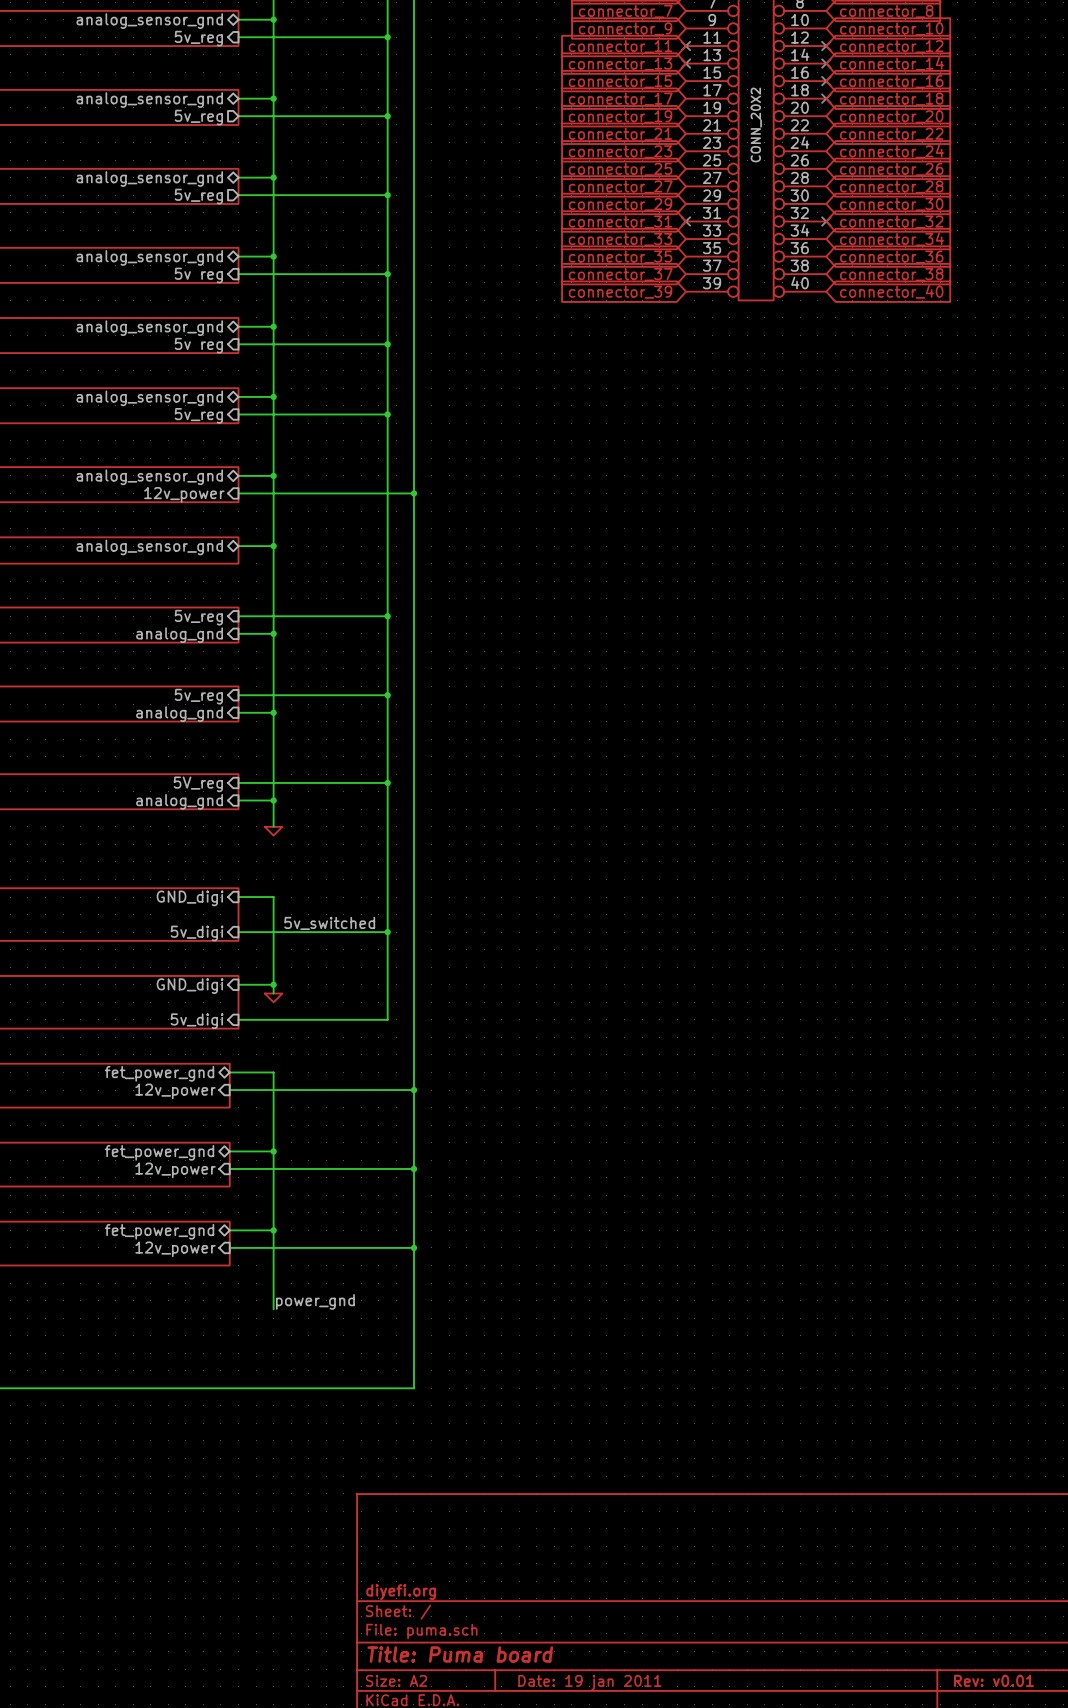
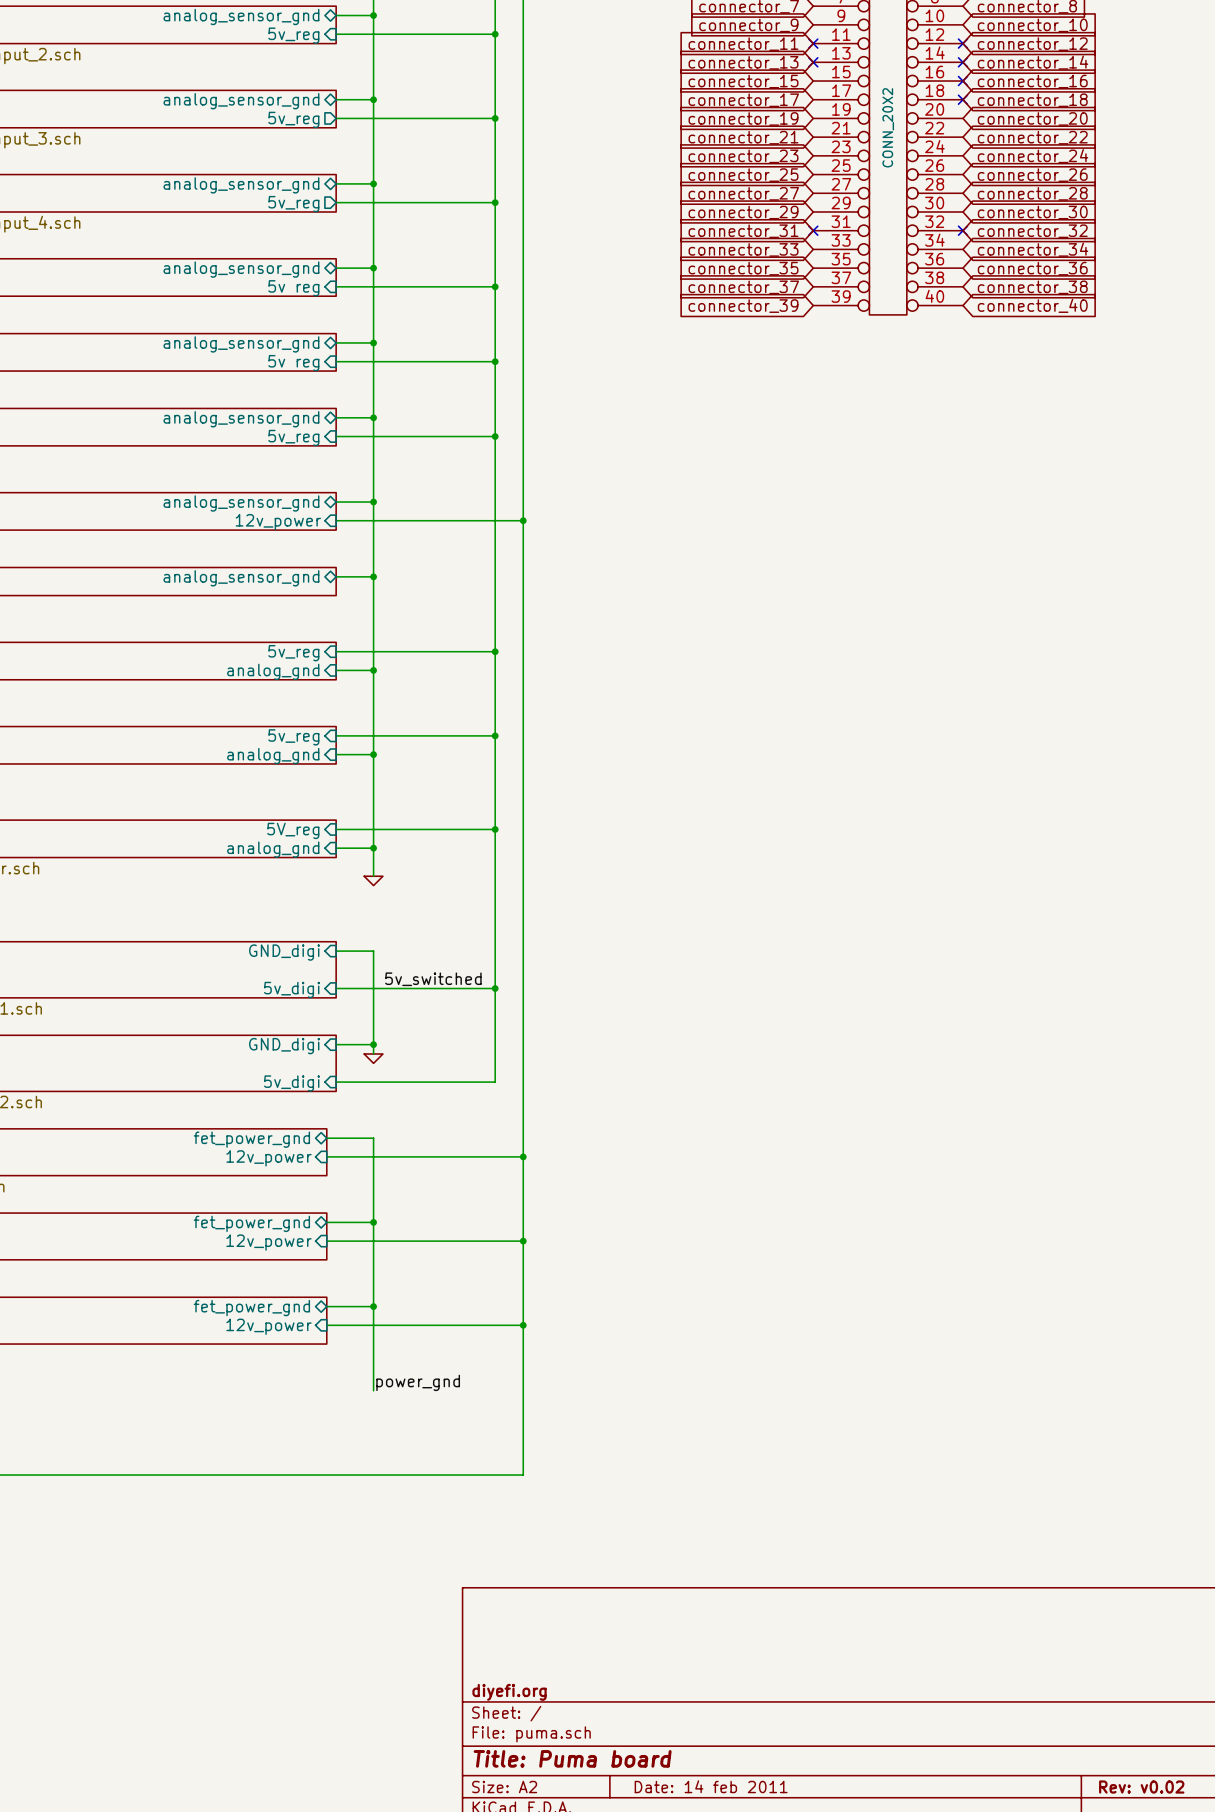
title block: Rev: v0.01 (993, 1680) -> Rev: v0.02 (1141, 1787)
title block: Date: 19 jan 2011 (589, 1682) -> Date: 14 feb 2011 (711, 1786)

